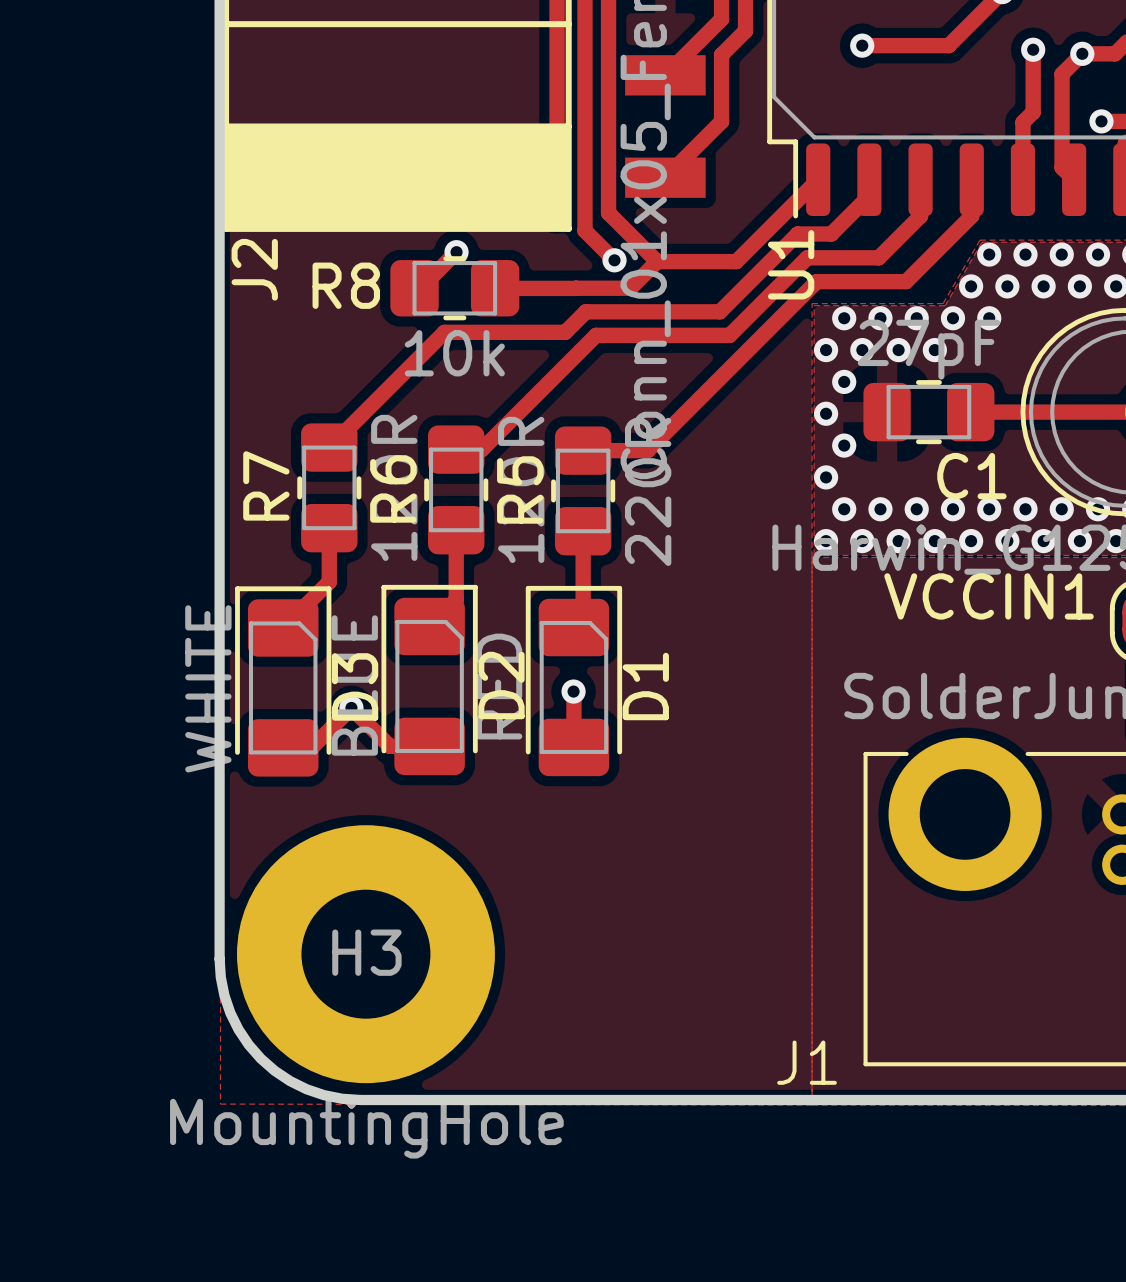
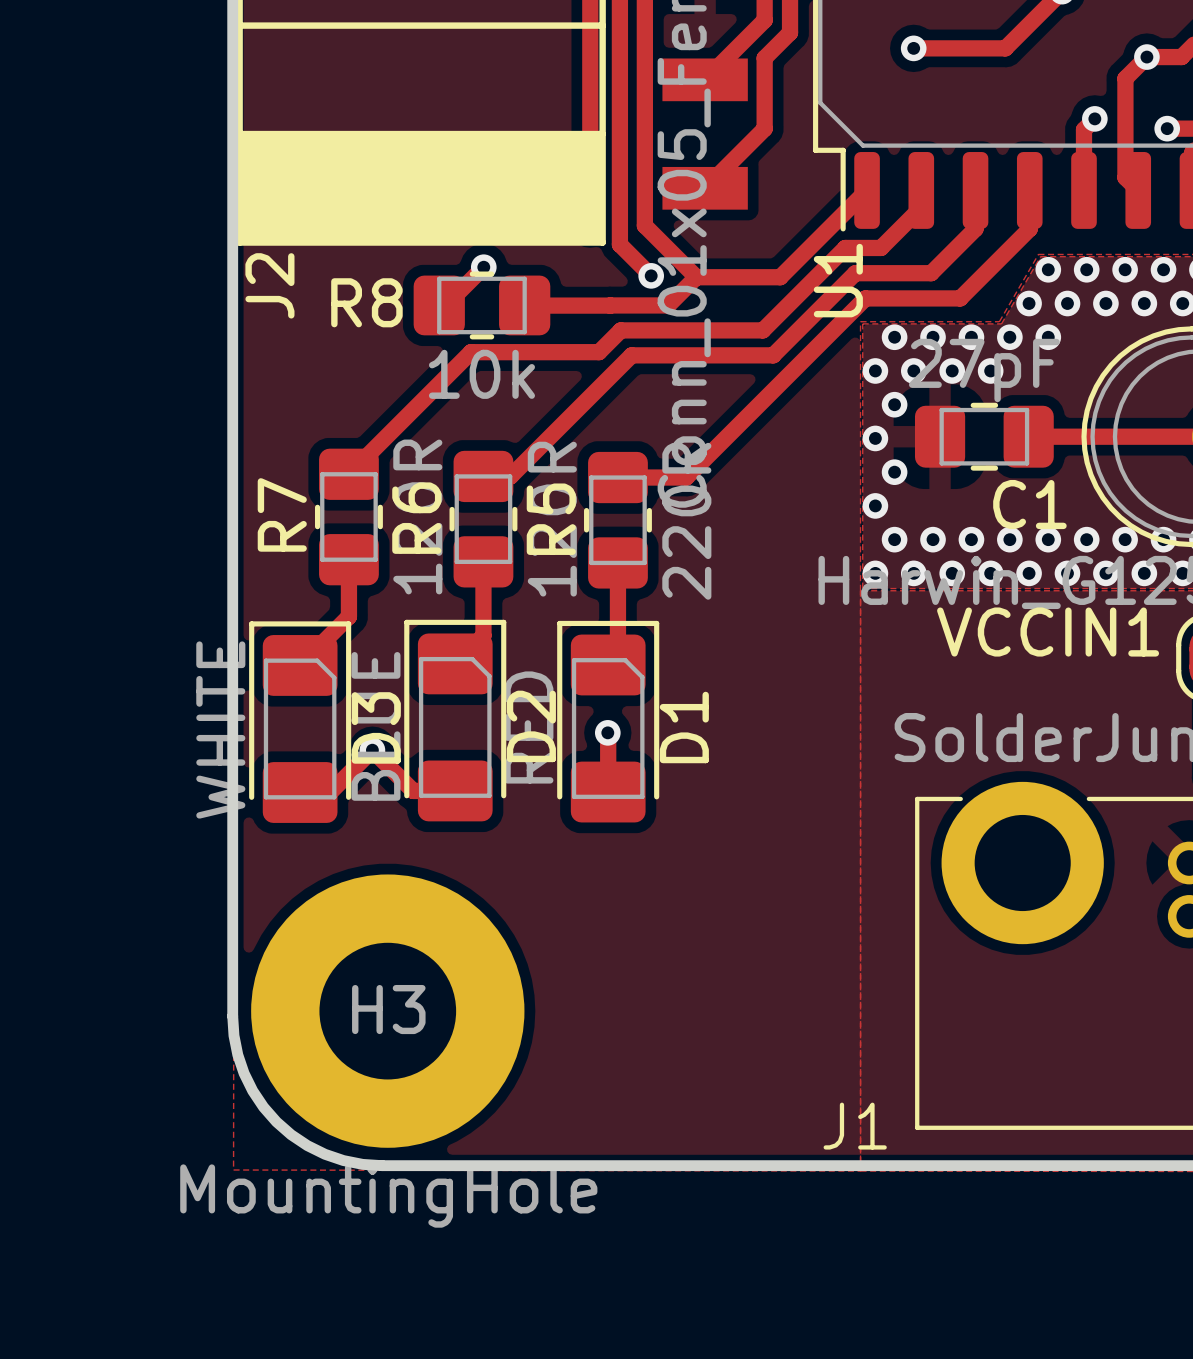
track: (1033, 49) (1033, 112) -> none
via position: (1033, 49) -> (1094, 118)

